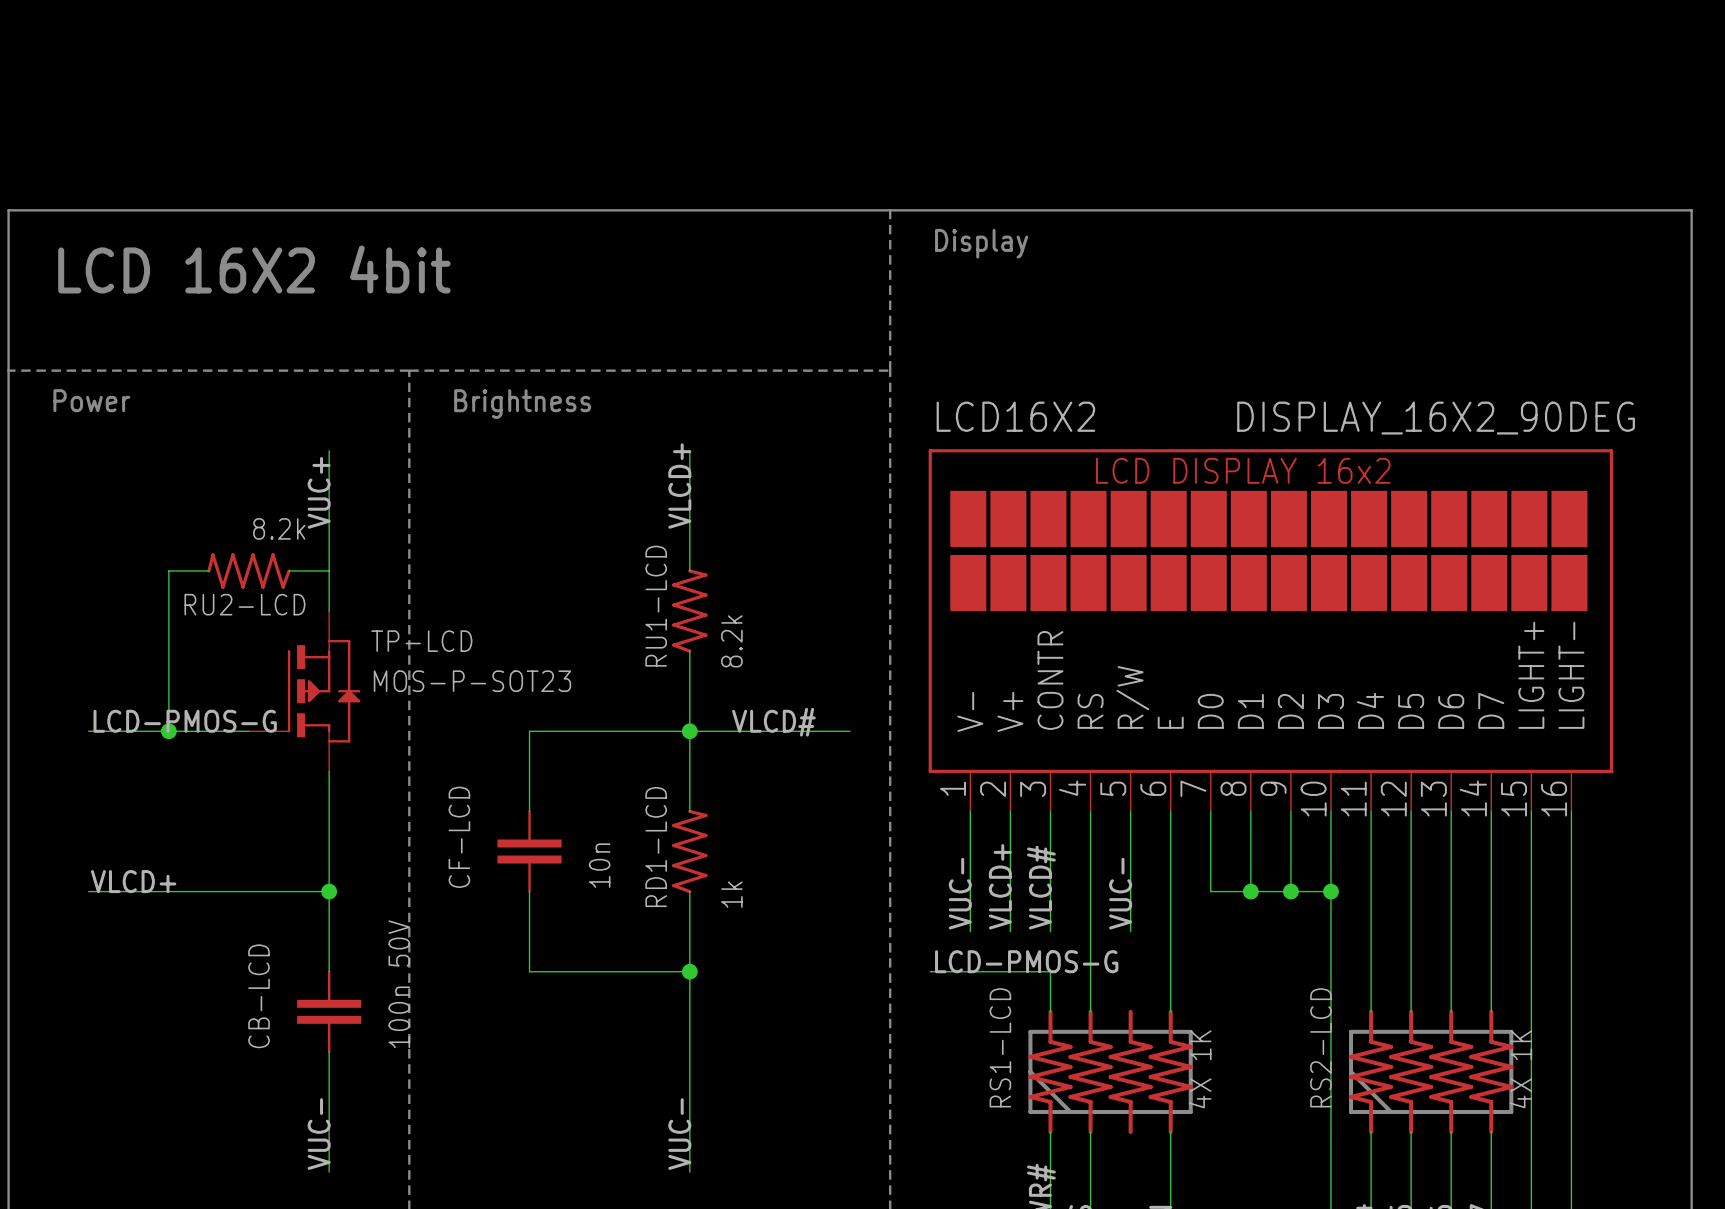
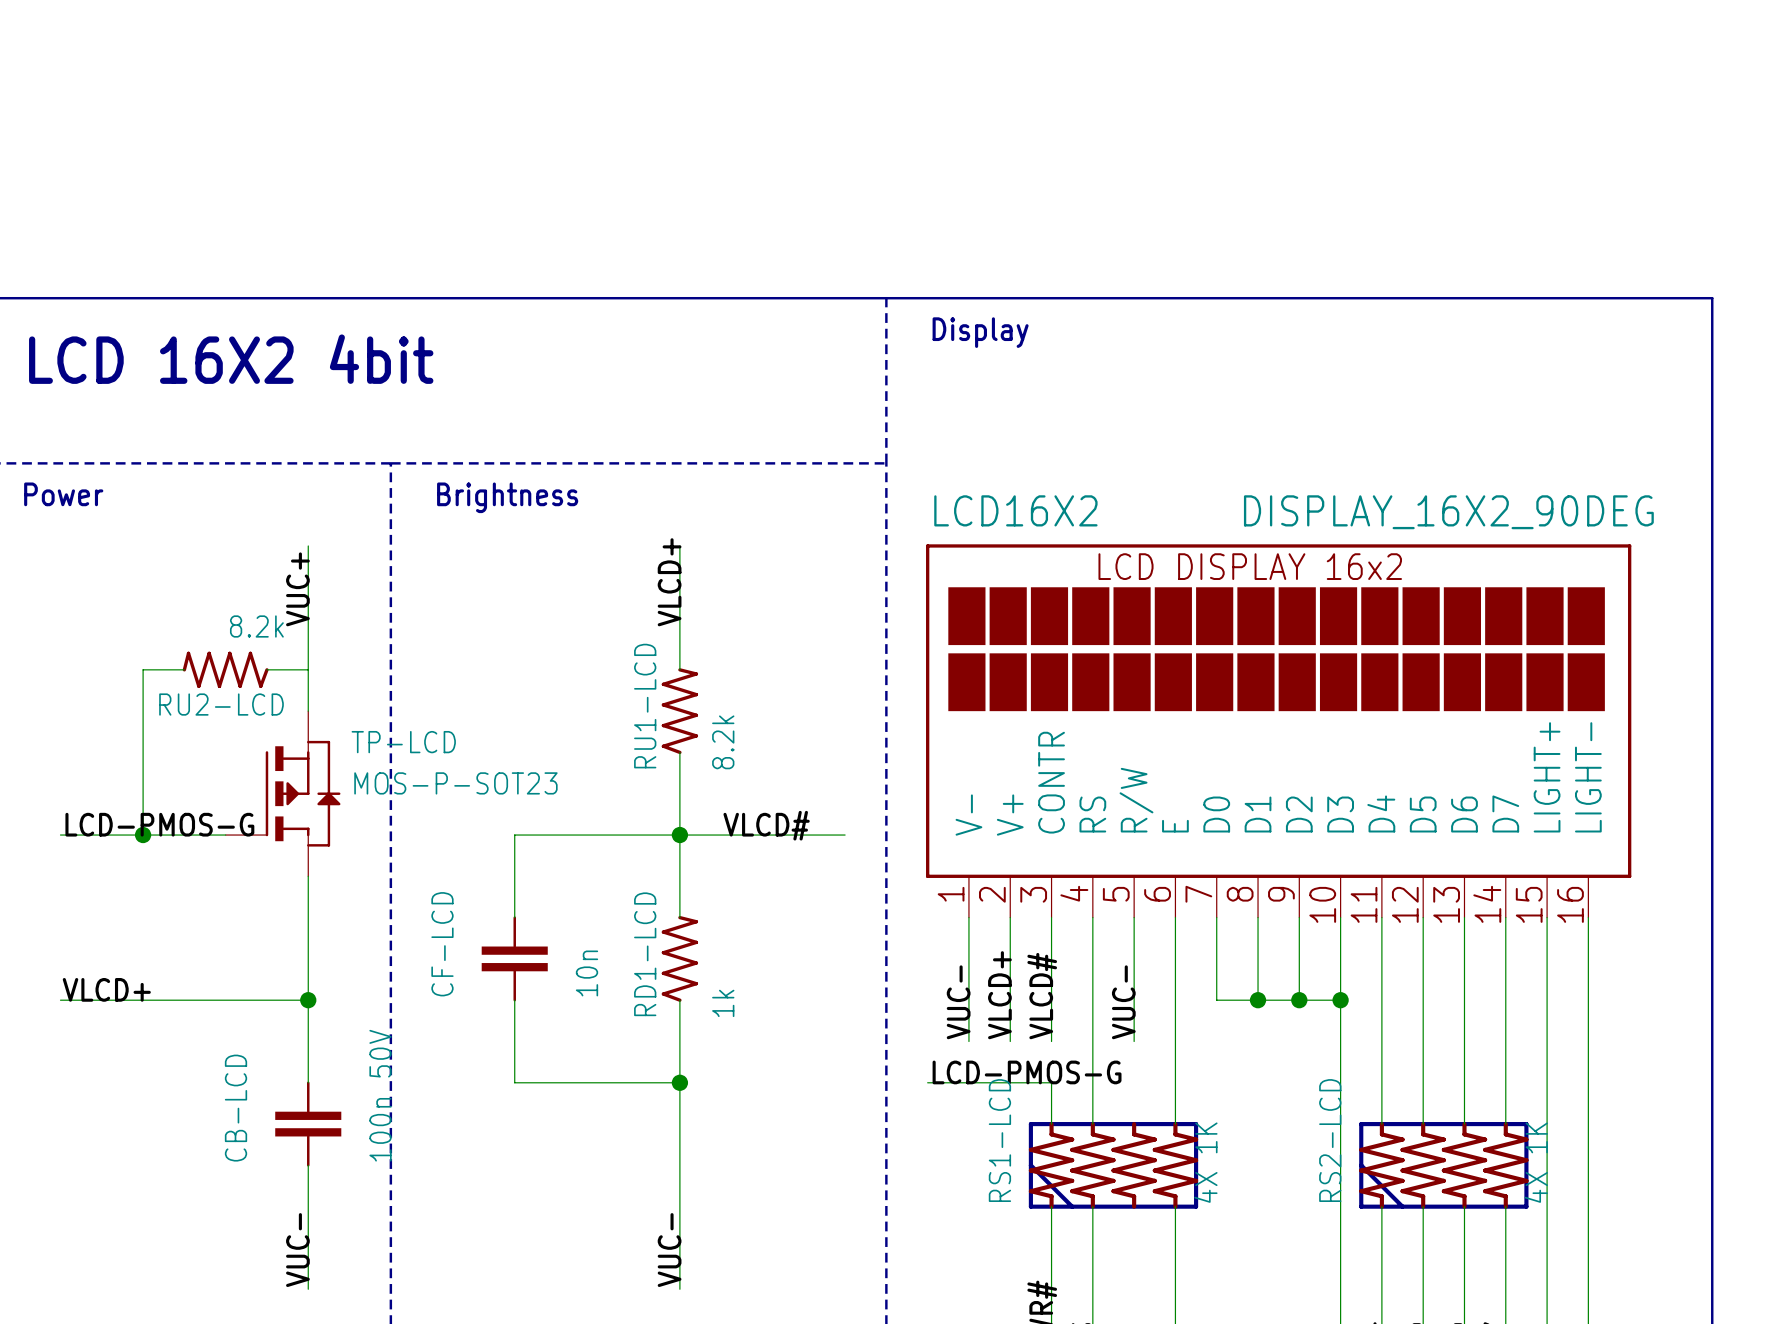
RS1-LCD symbol: [1028, 1009, 1193, 1135] -> [1028, 1122, 1199, 1209]
RS2-LCD symbol: [1349, 1009, 1514, 1135] -> [1359, 1122, 1529, 1209]

